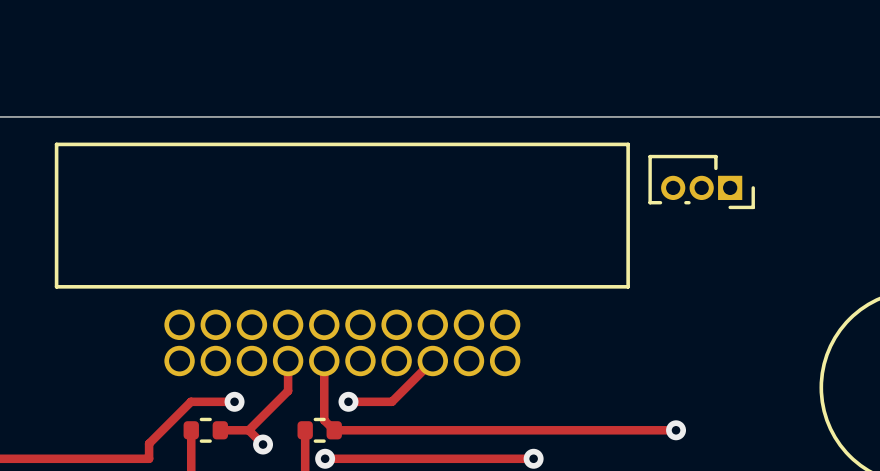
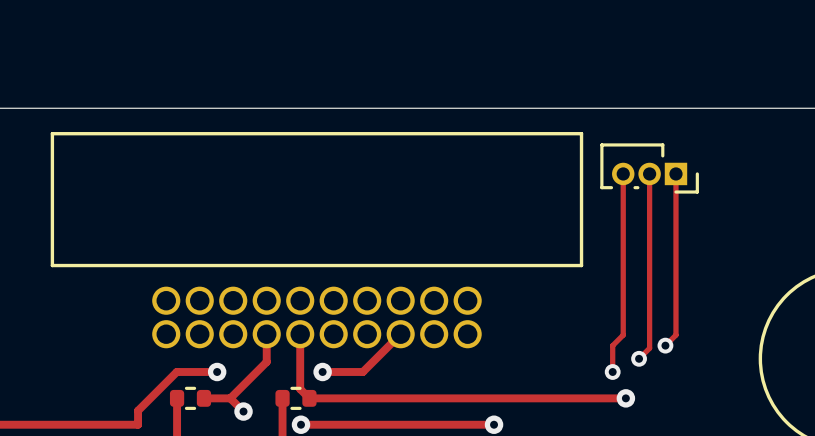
track: none -> (623, 173) (623, 335) (612, 345) (612, 371)
track: none -> (649, 173) (649, 348) (639, 358)
track: none -> (675, 173) (675, 335) (665, 345)
via: none -> (665, 345)
via: none -> (639, 358)
via: none -> (612, 371)

